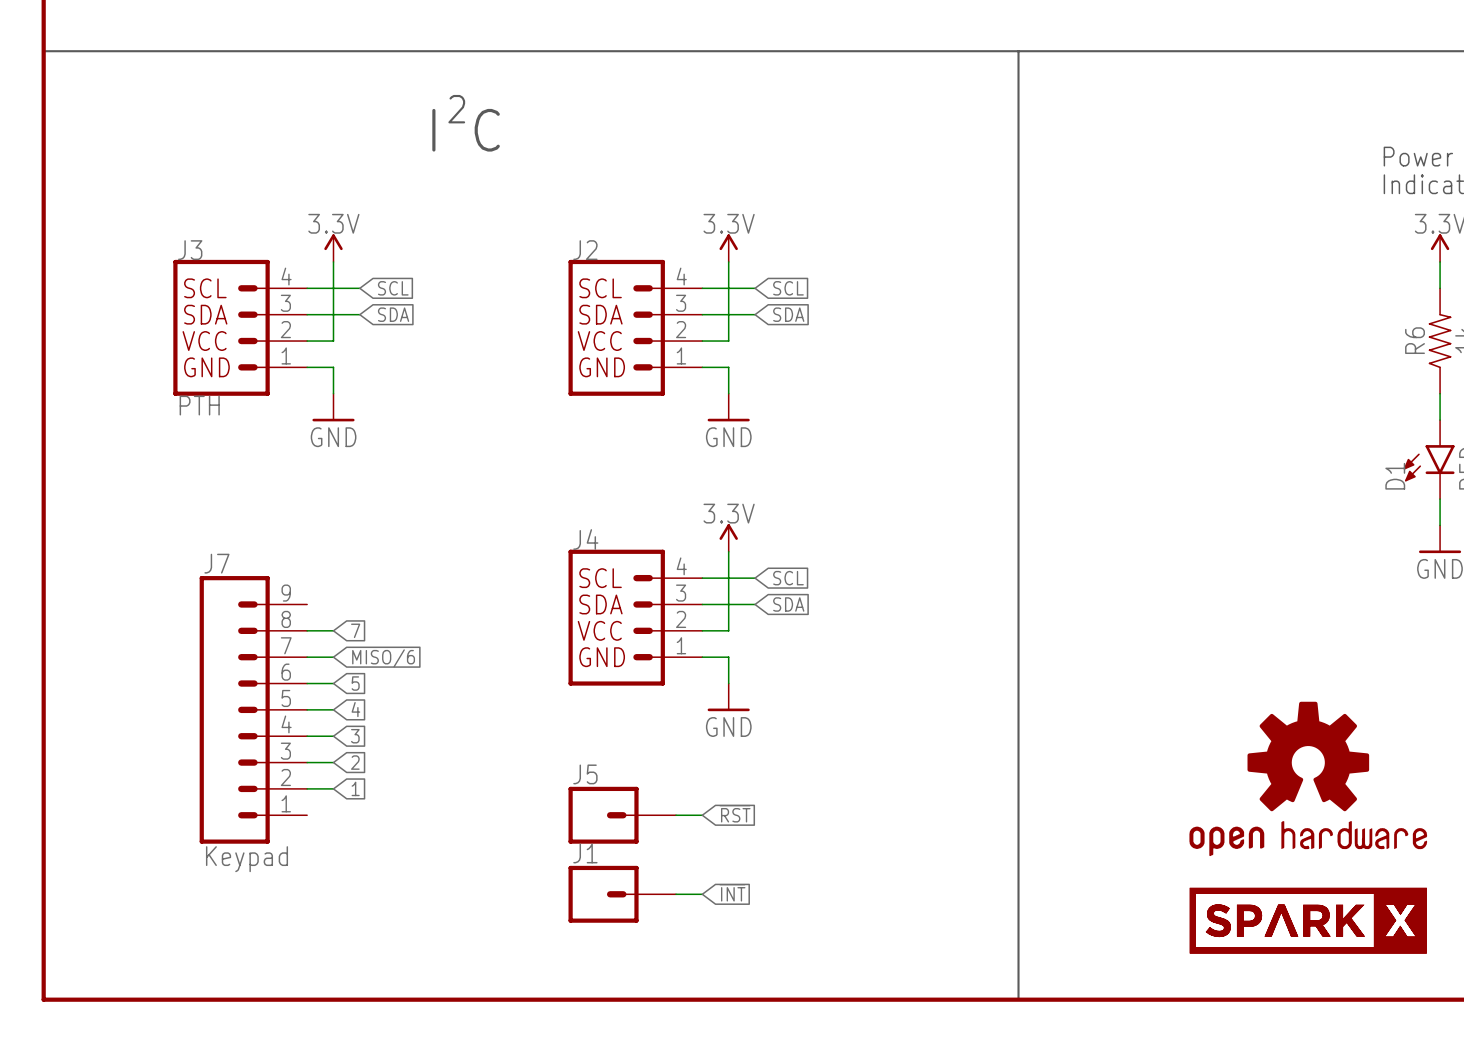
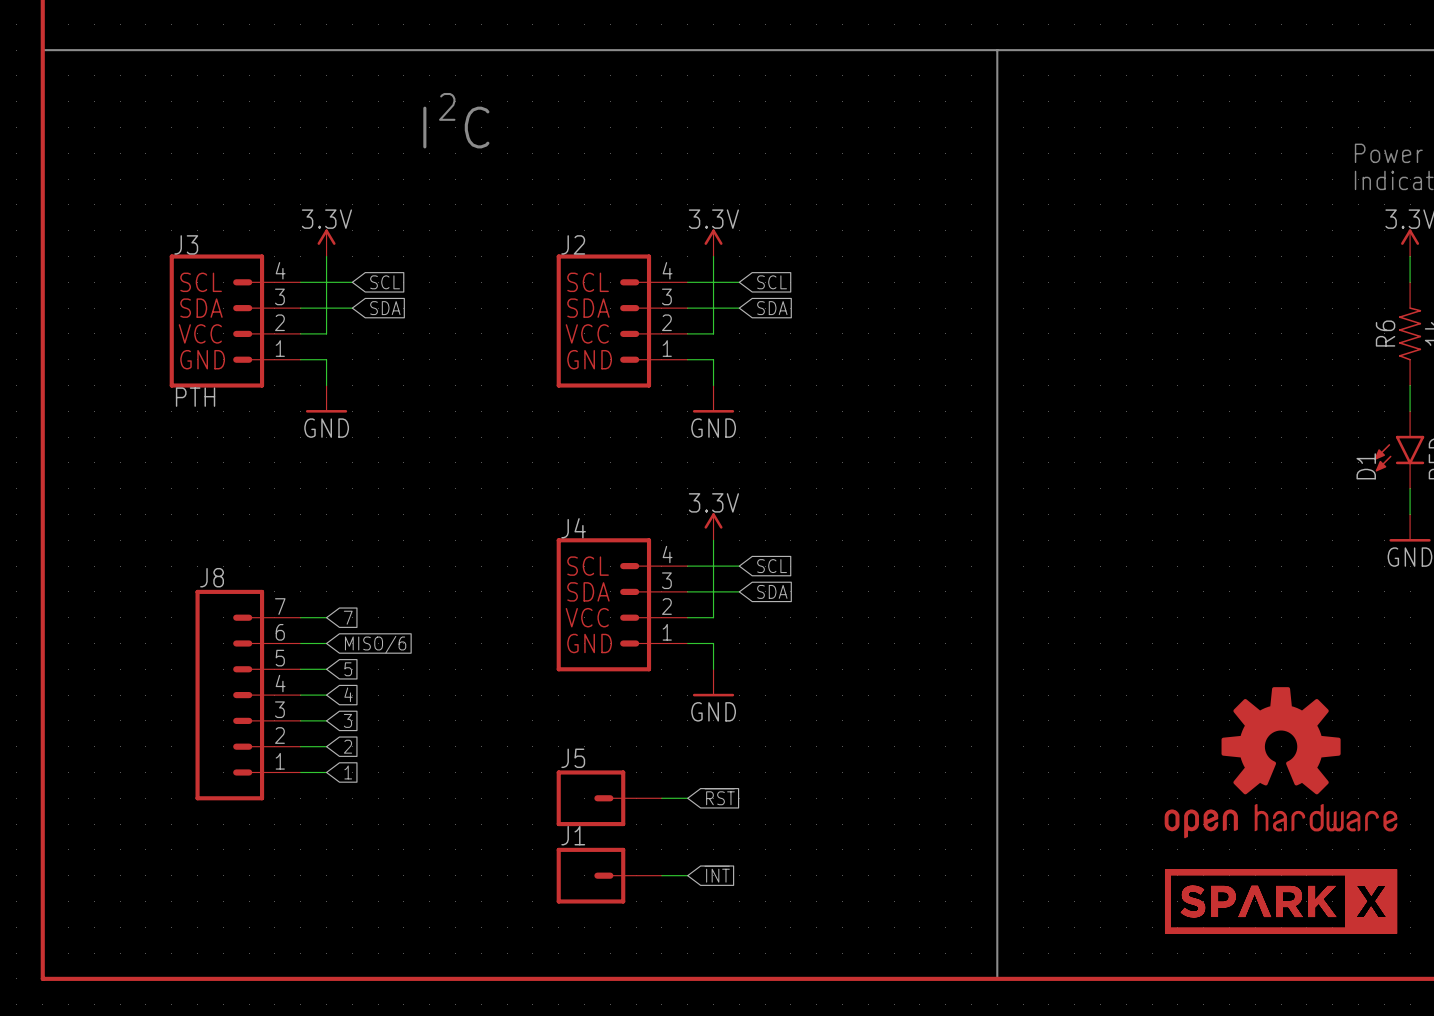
J7: Keypad (253, 709) -> none
J8: none -> (248, 695)

